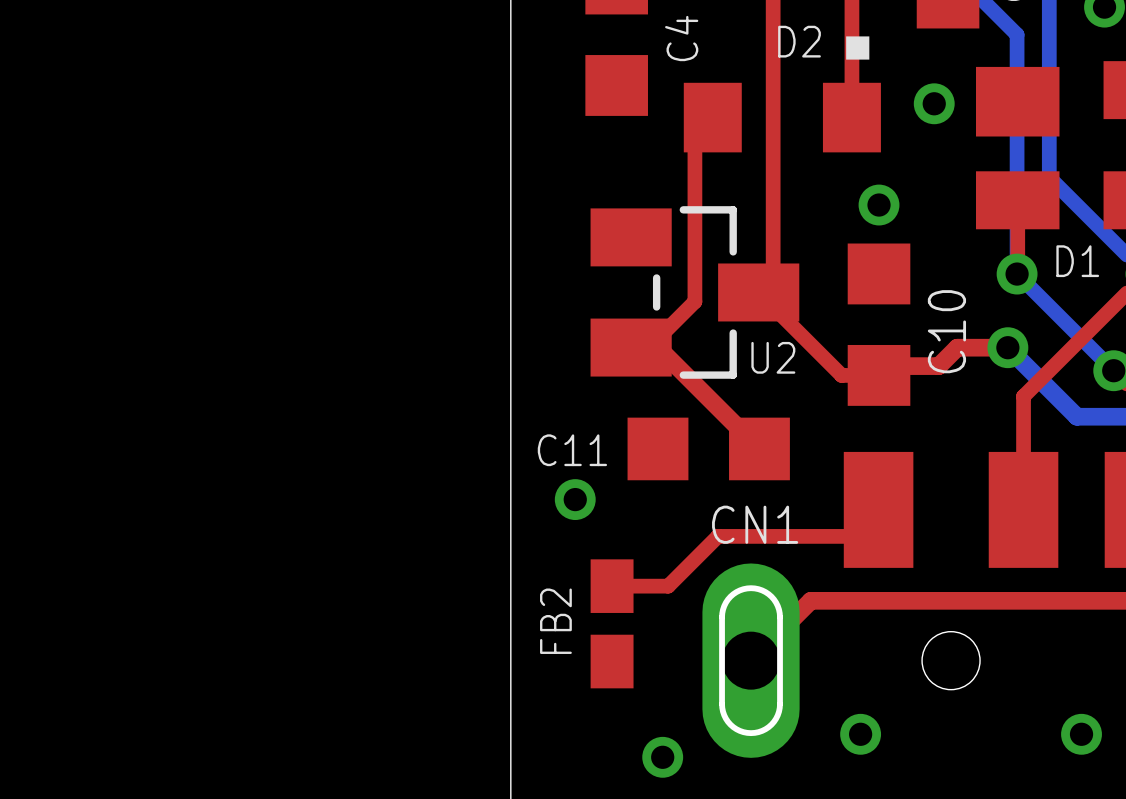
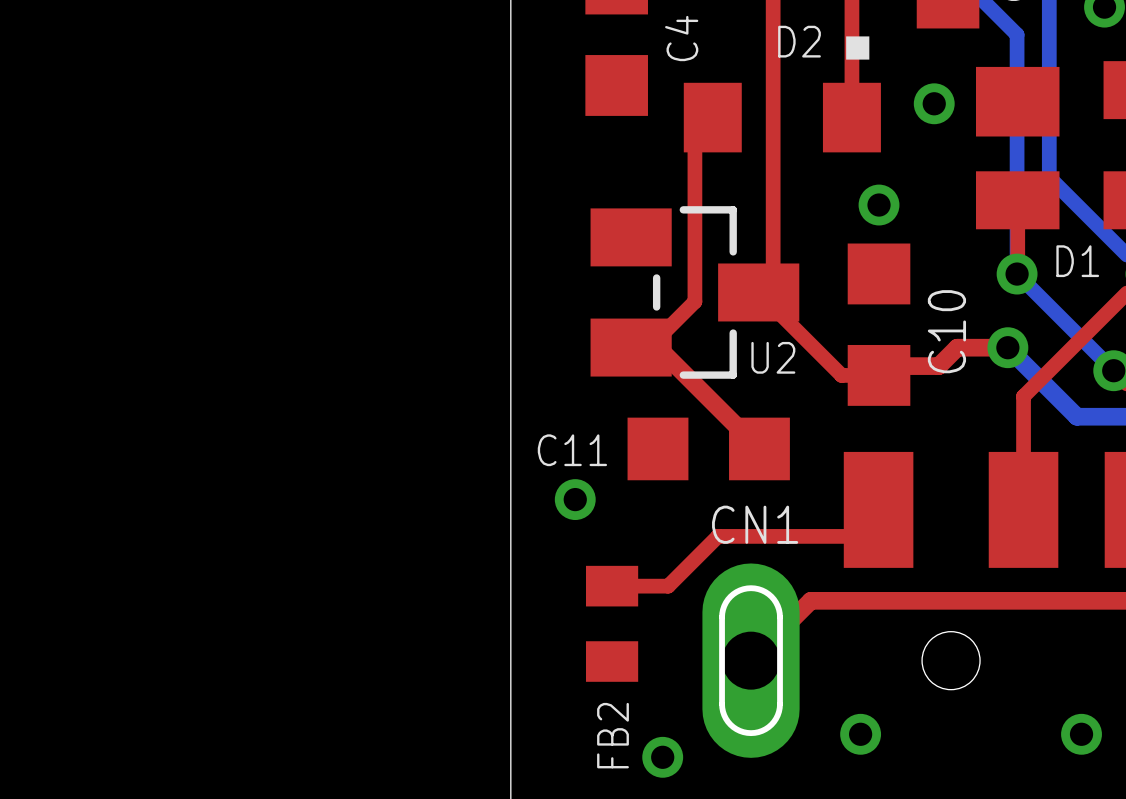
FB2 footprint: [590, 559, 634, 689] -> [585, 565, 639, 682]
FB2 name position: FB2 (555, 621) -> FB2 (613, 735)

